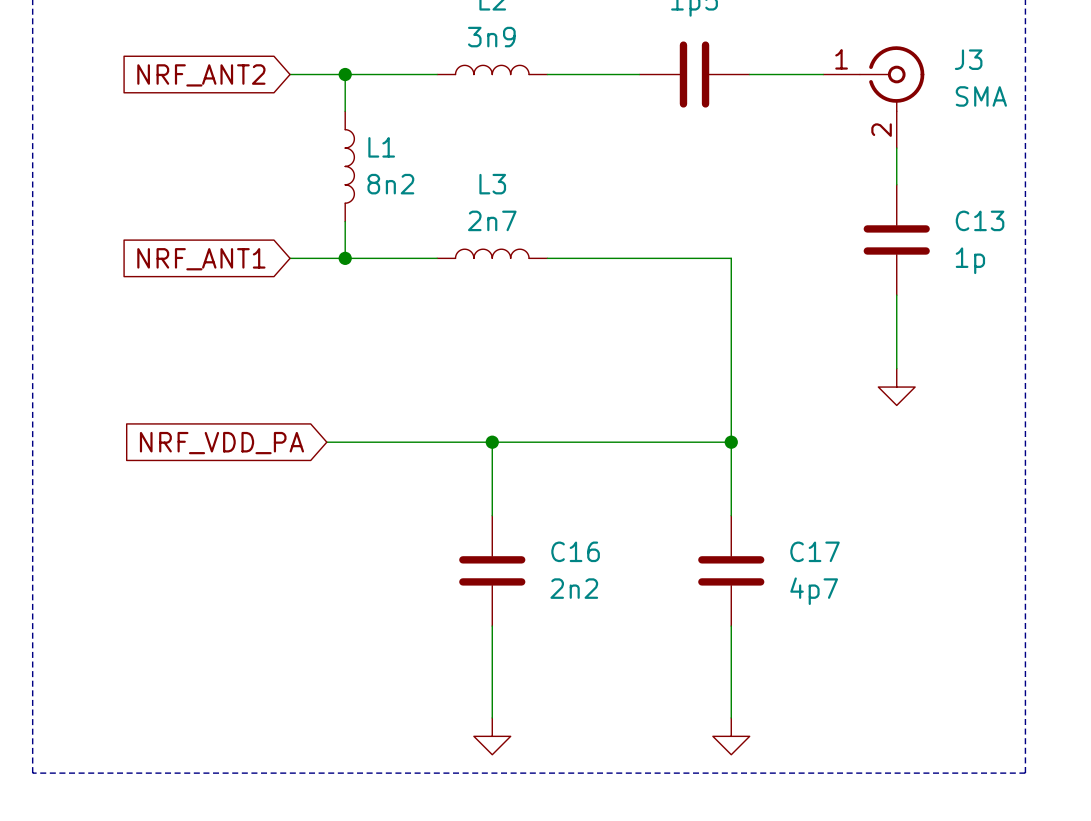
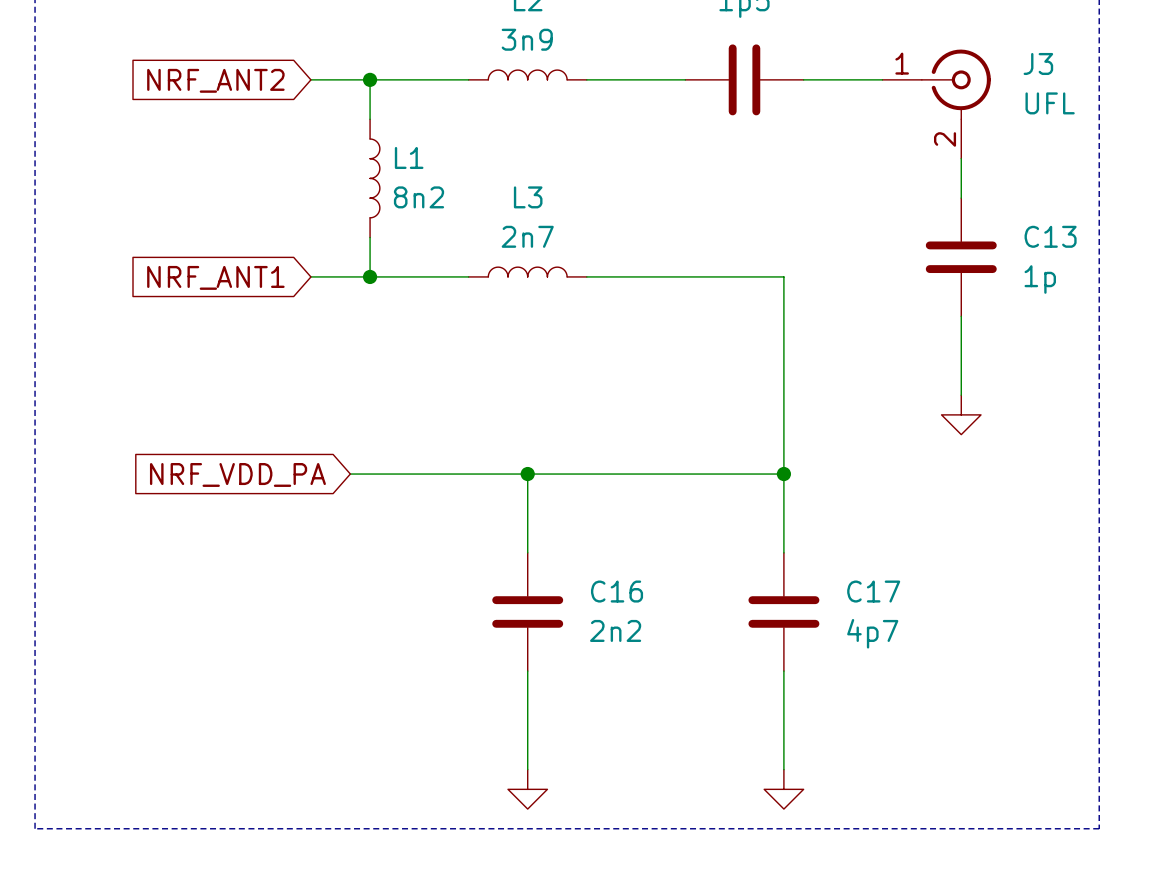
J3 value: SMA (981, 96) -> UFL (1050, 103)

